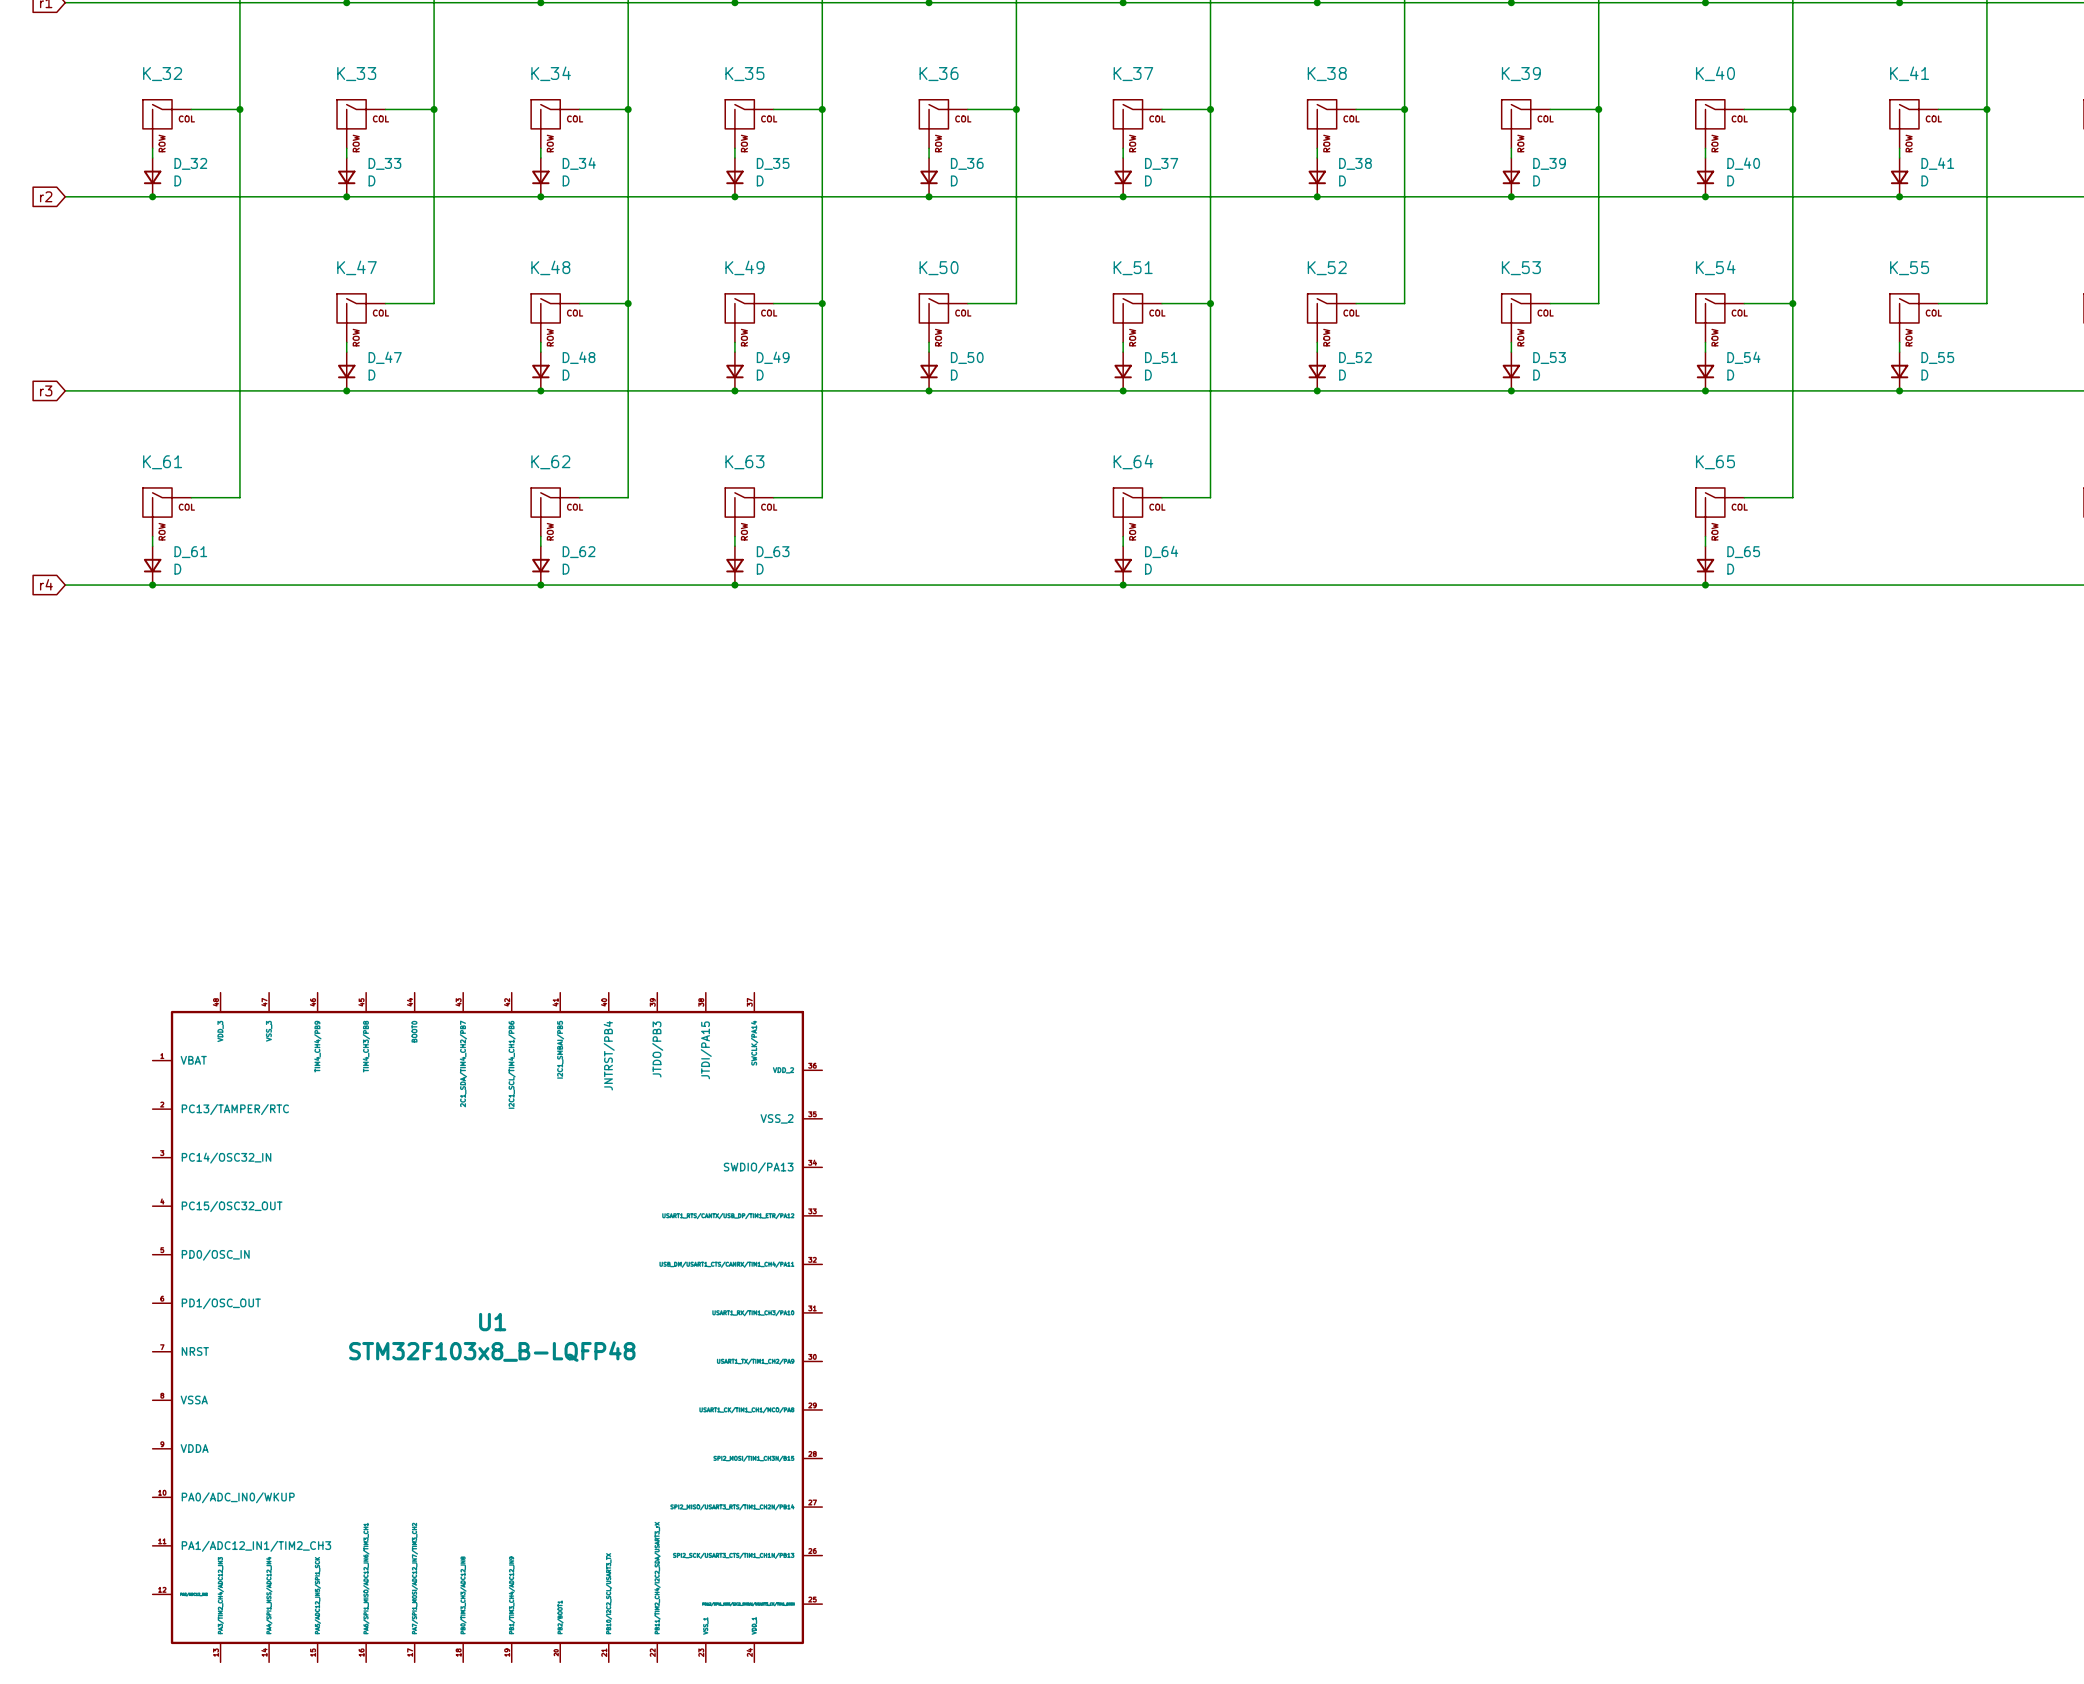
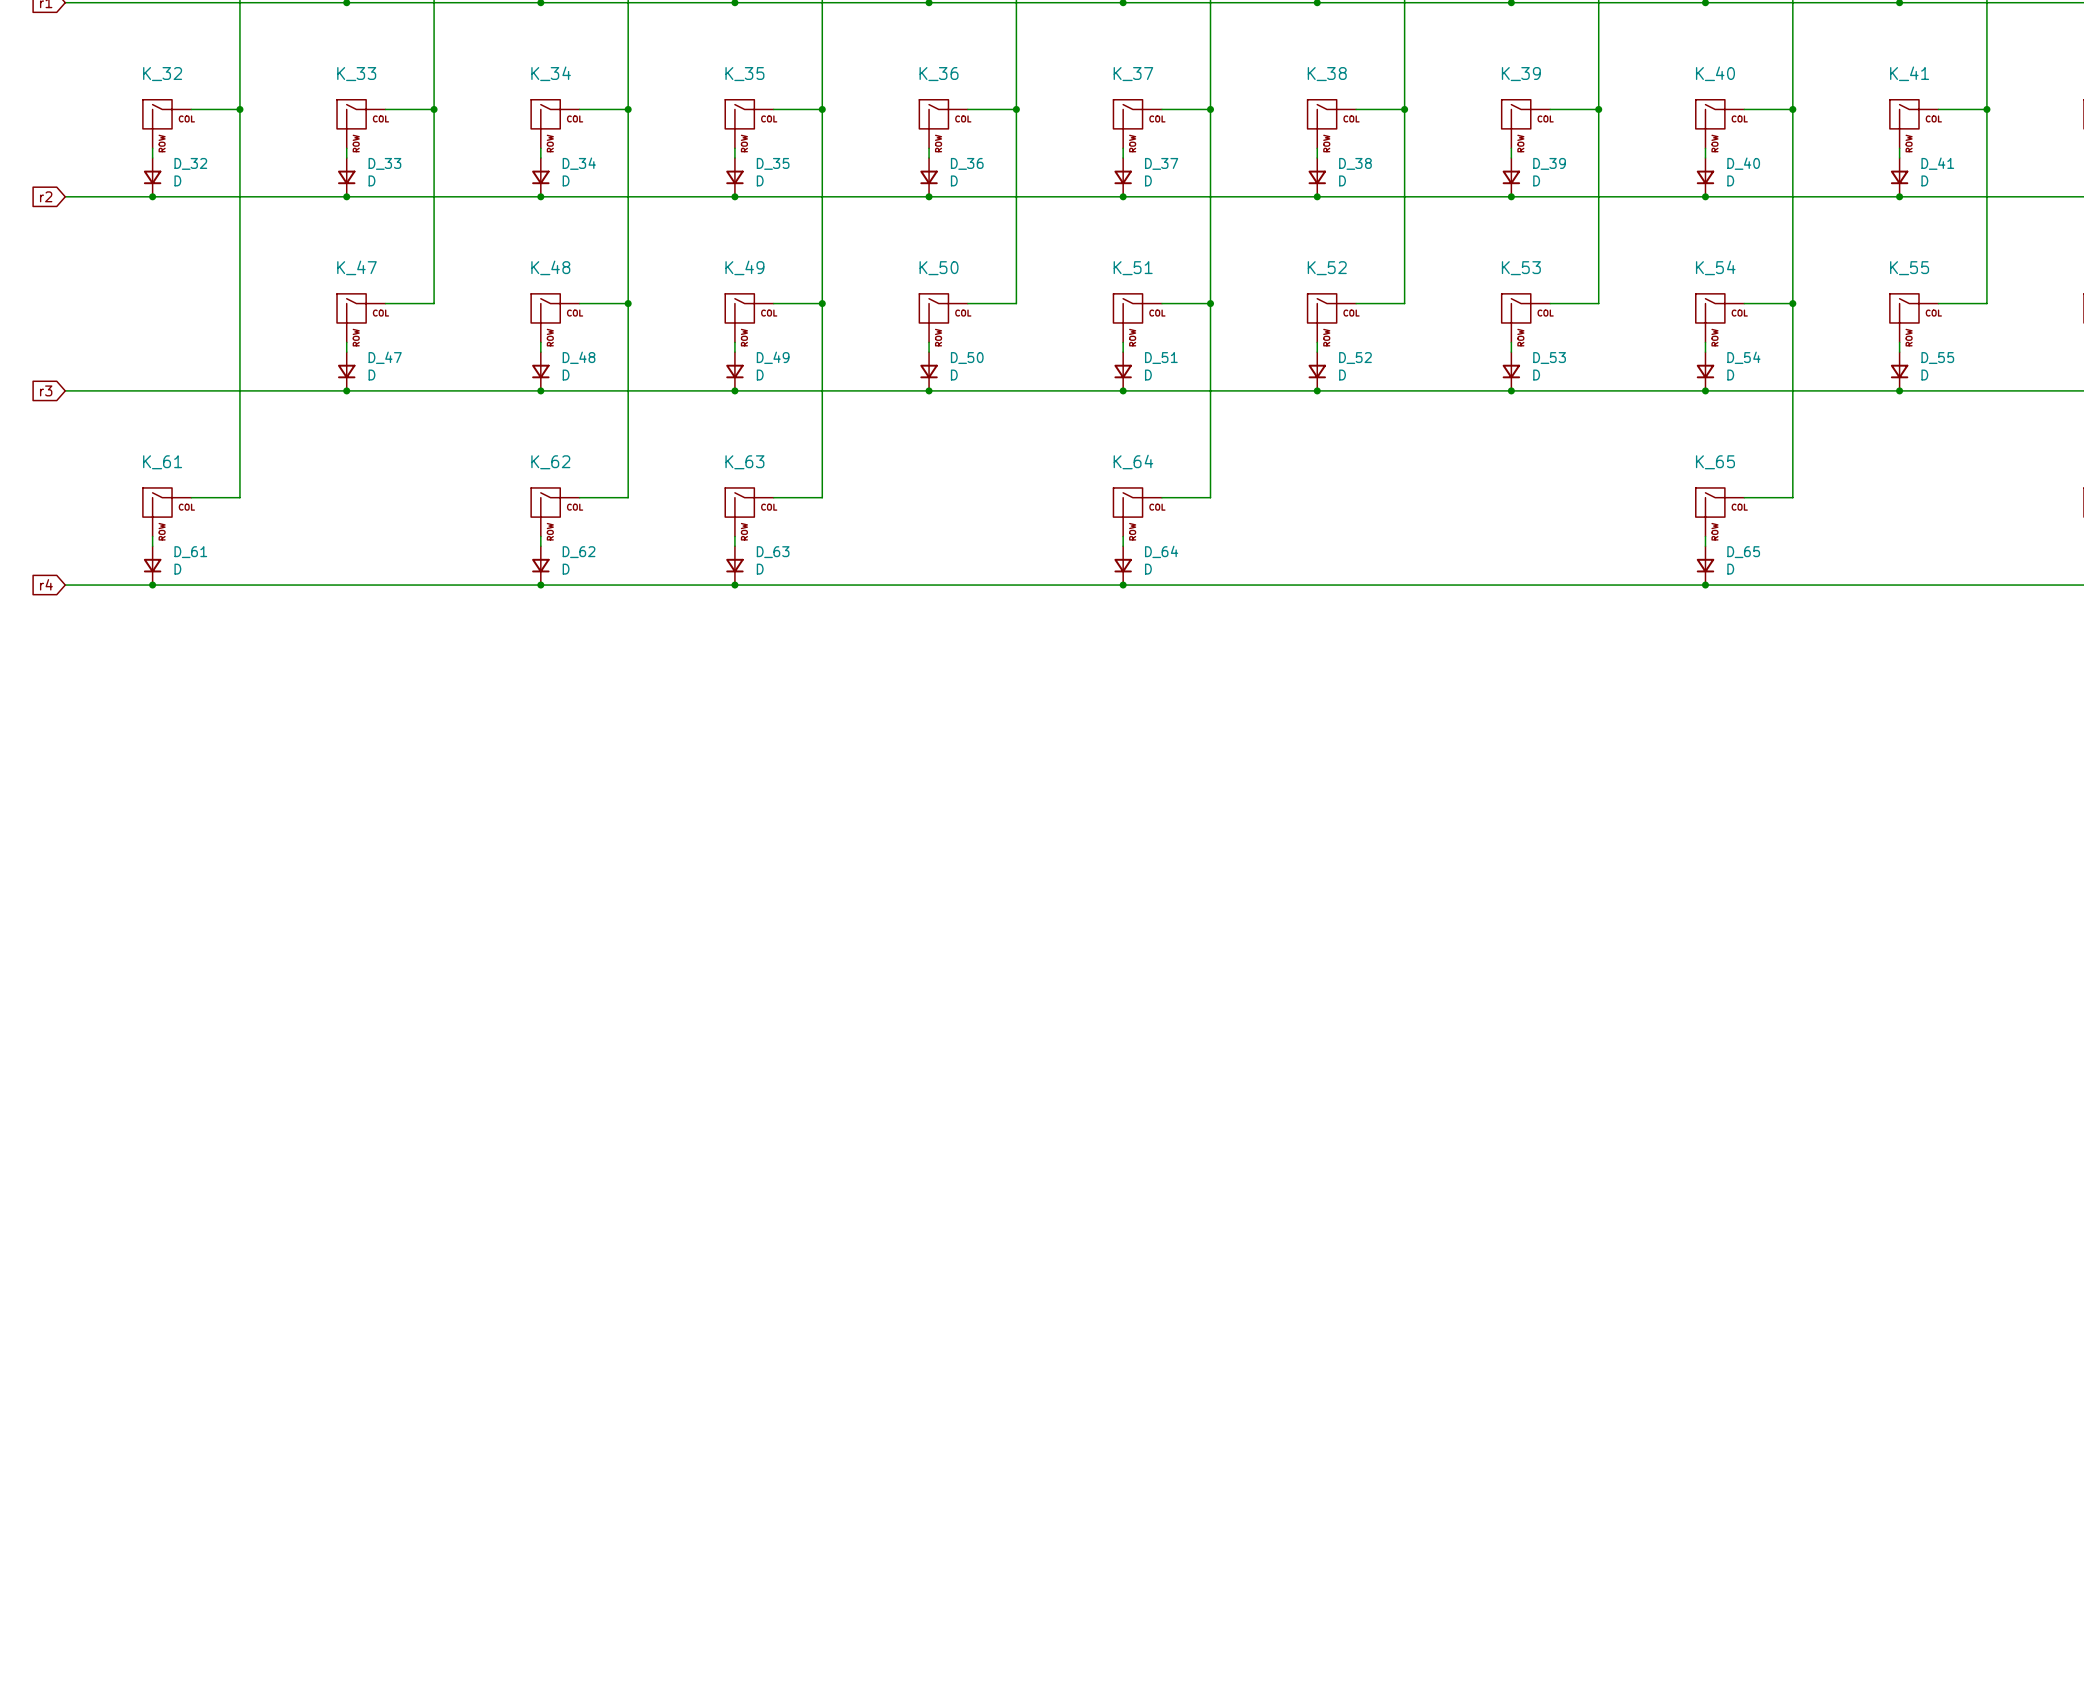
U1: STM32F103x8_B-LQFP48 (487, 1327) -> none

